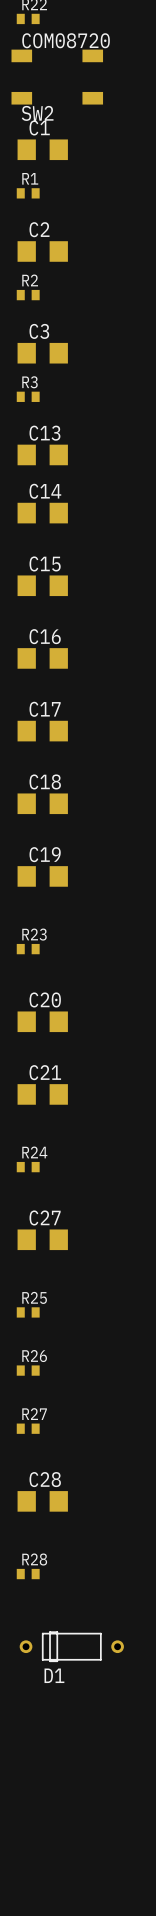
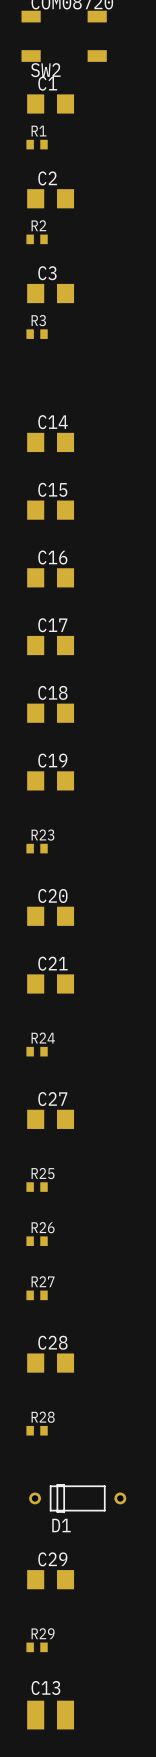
C13 footprint: [17, 444, 68, 466] -> [27, 1700, 75, 1730]
C29: none -> (50, 1579)
R29: none -> (37, 1647)

